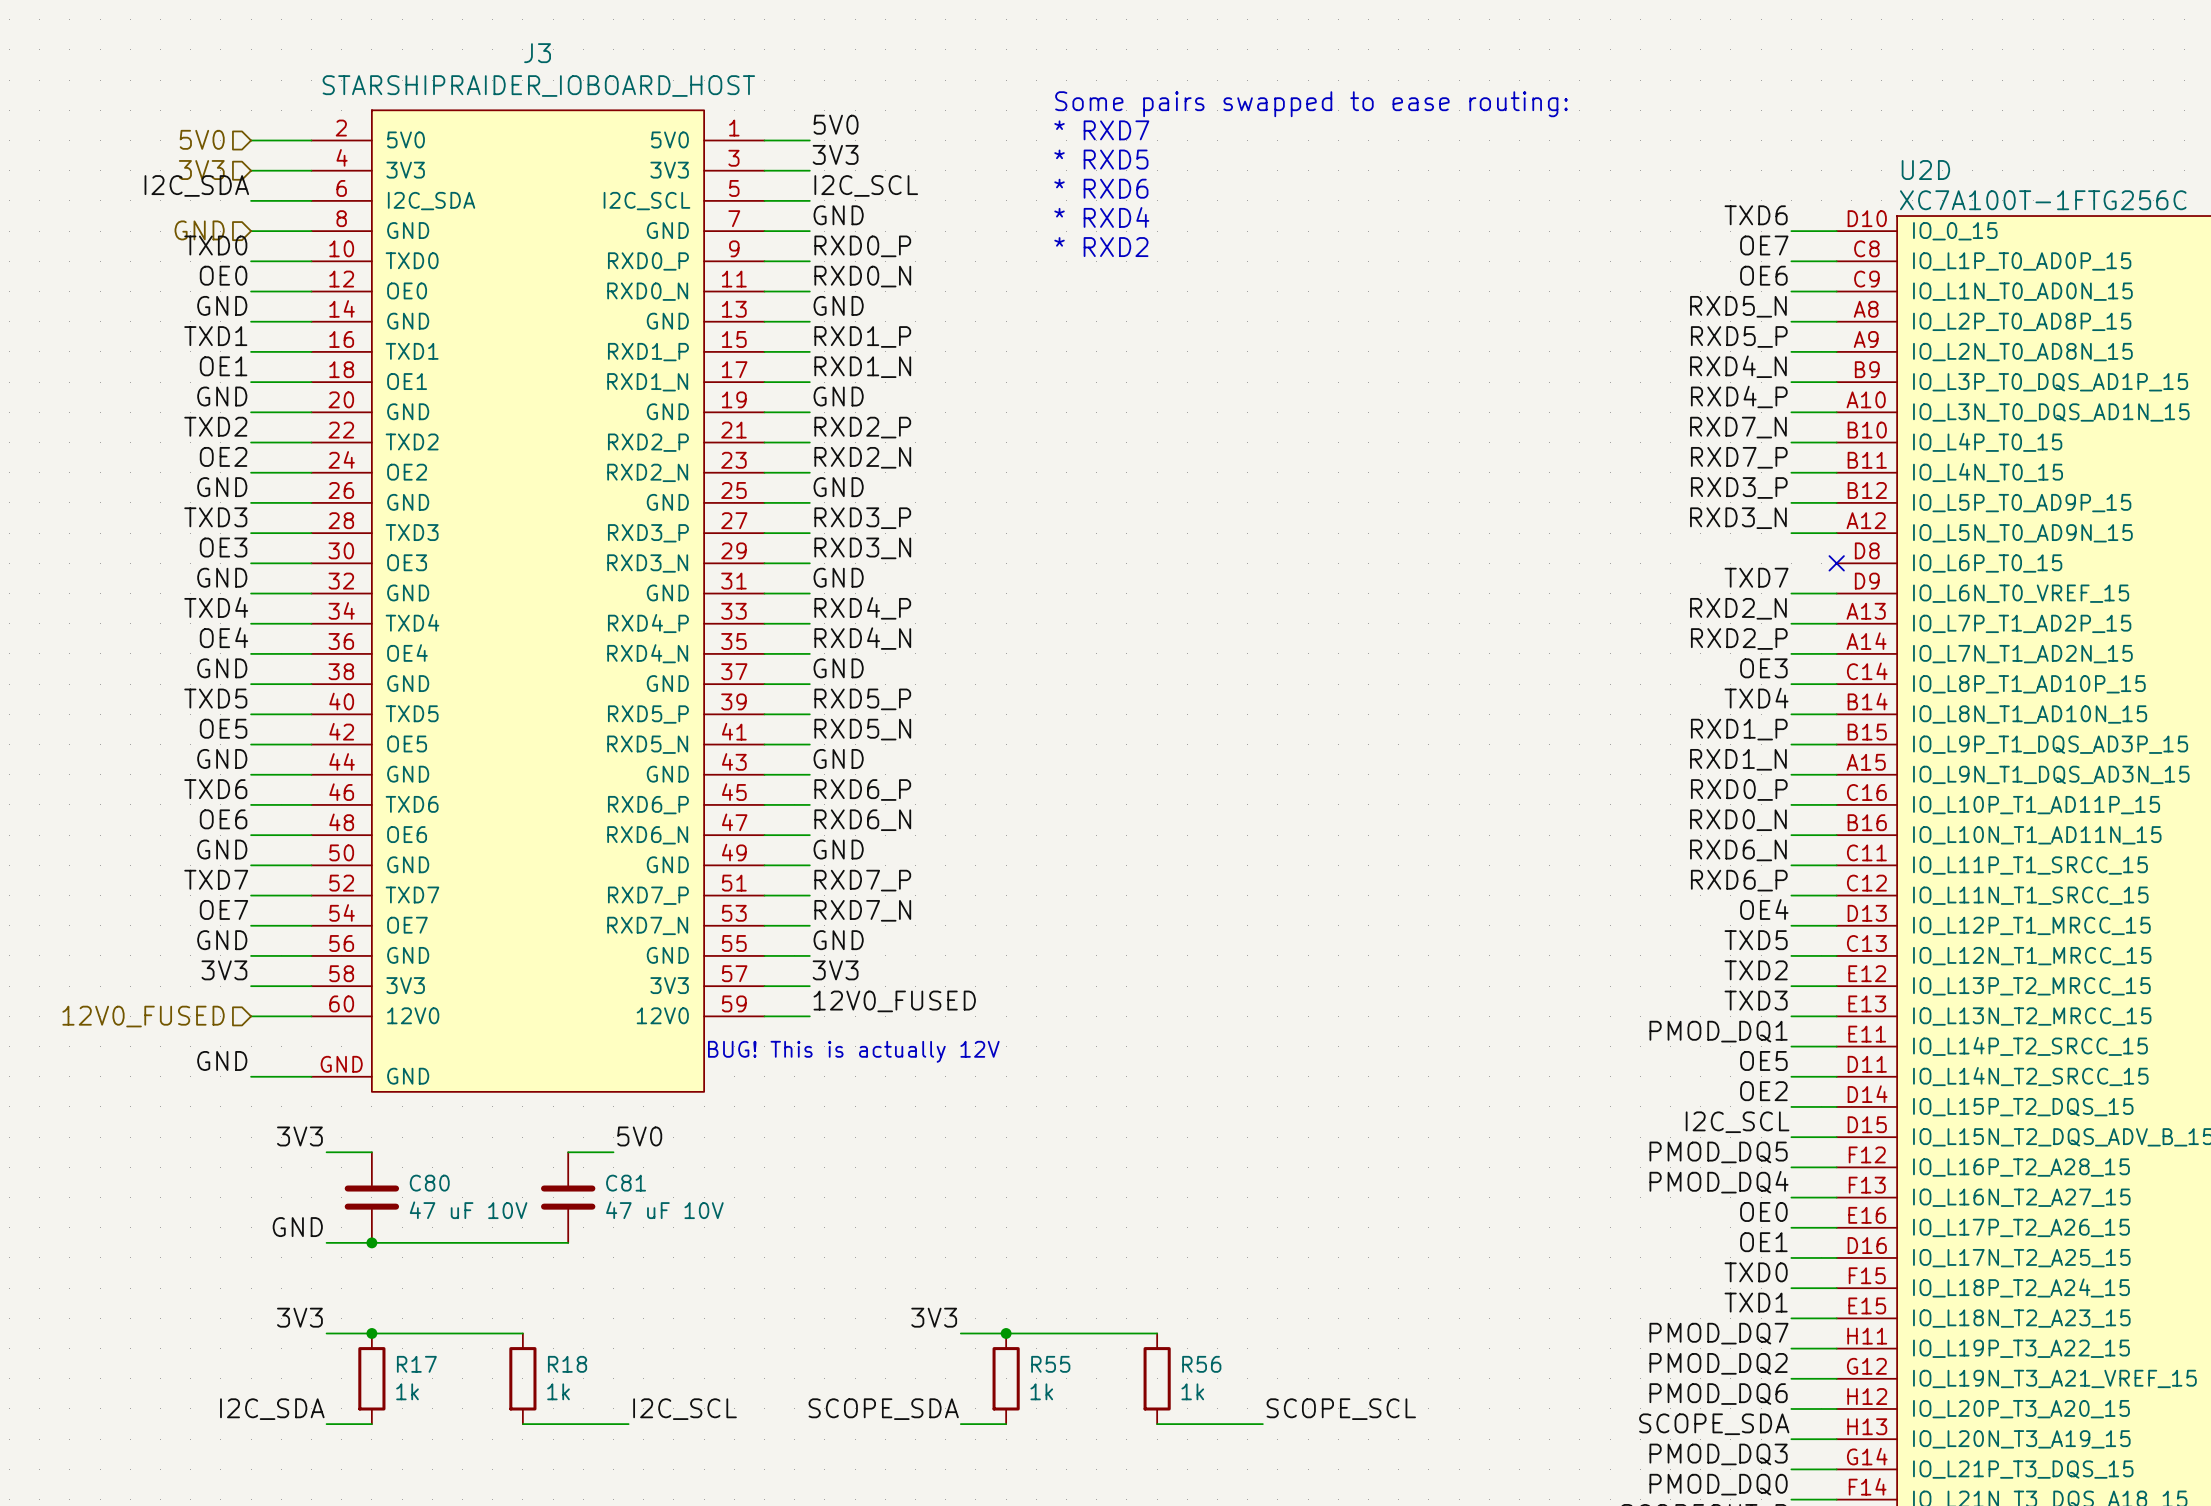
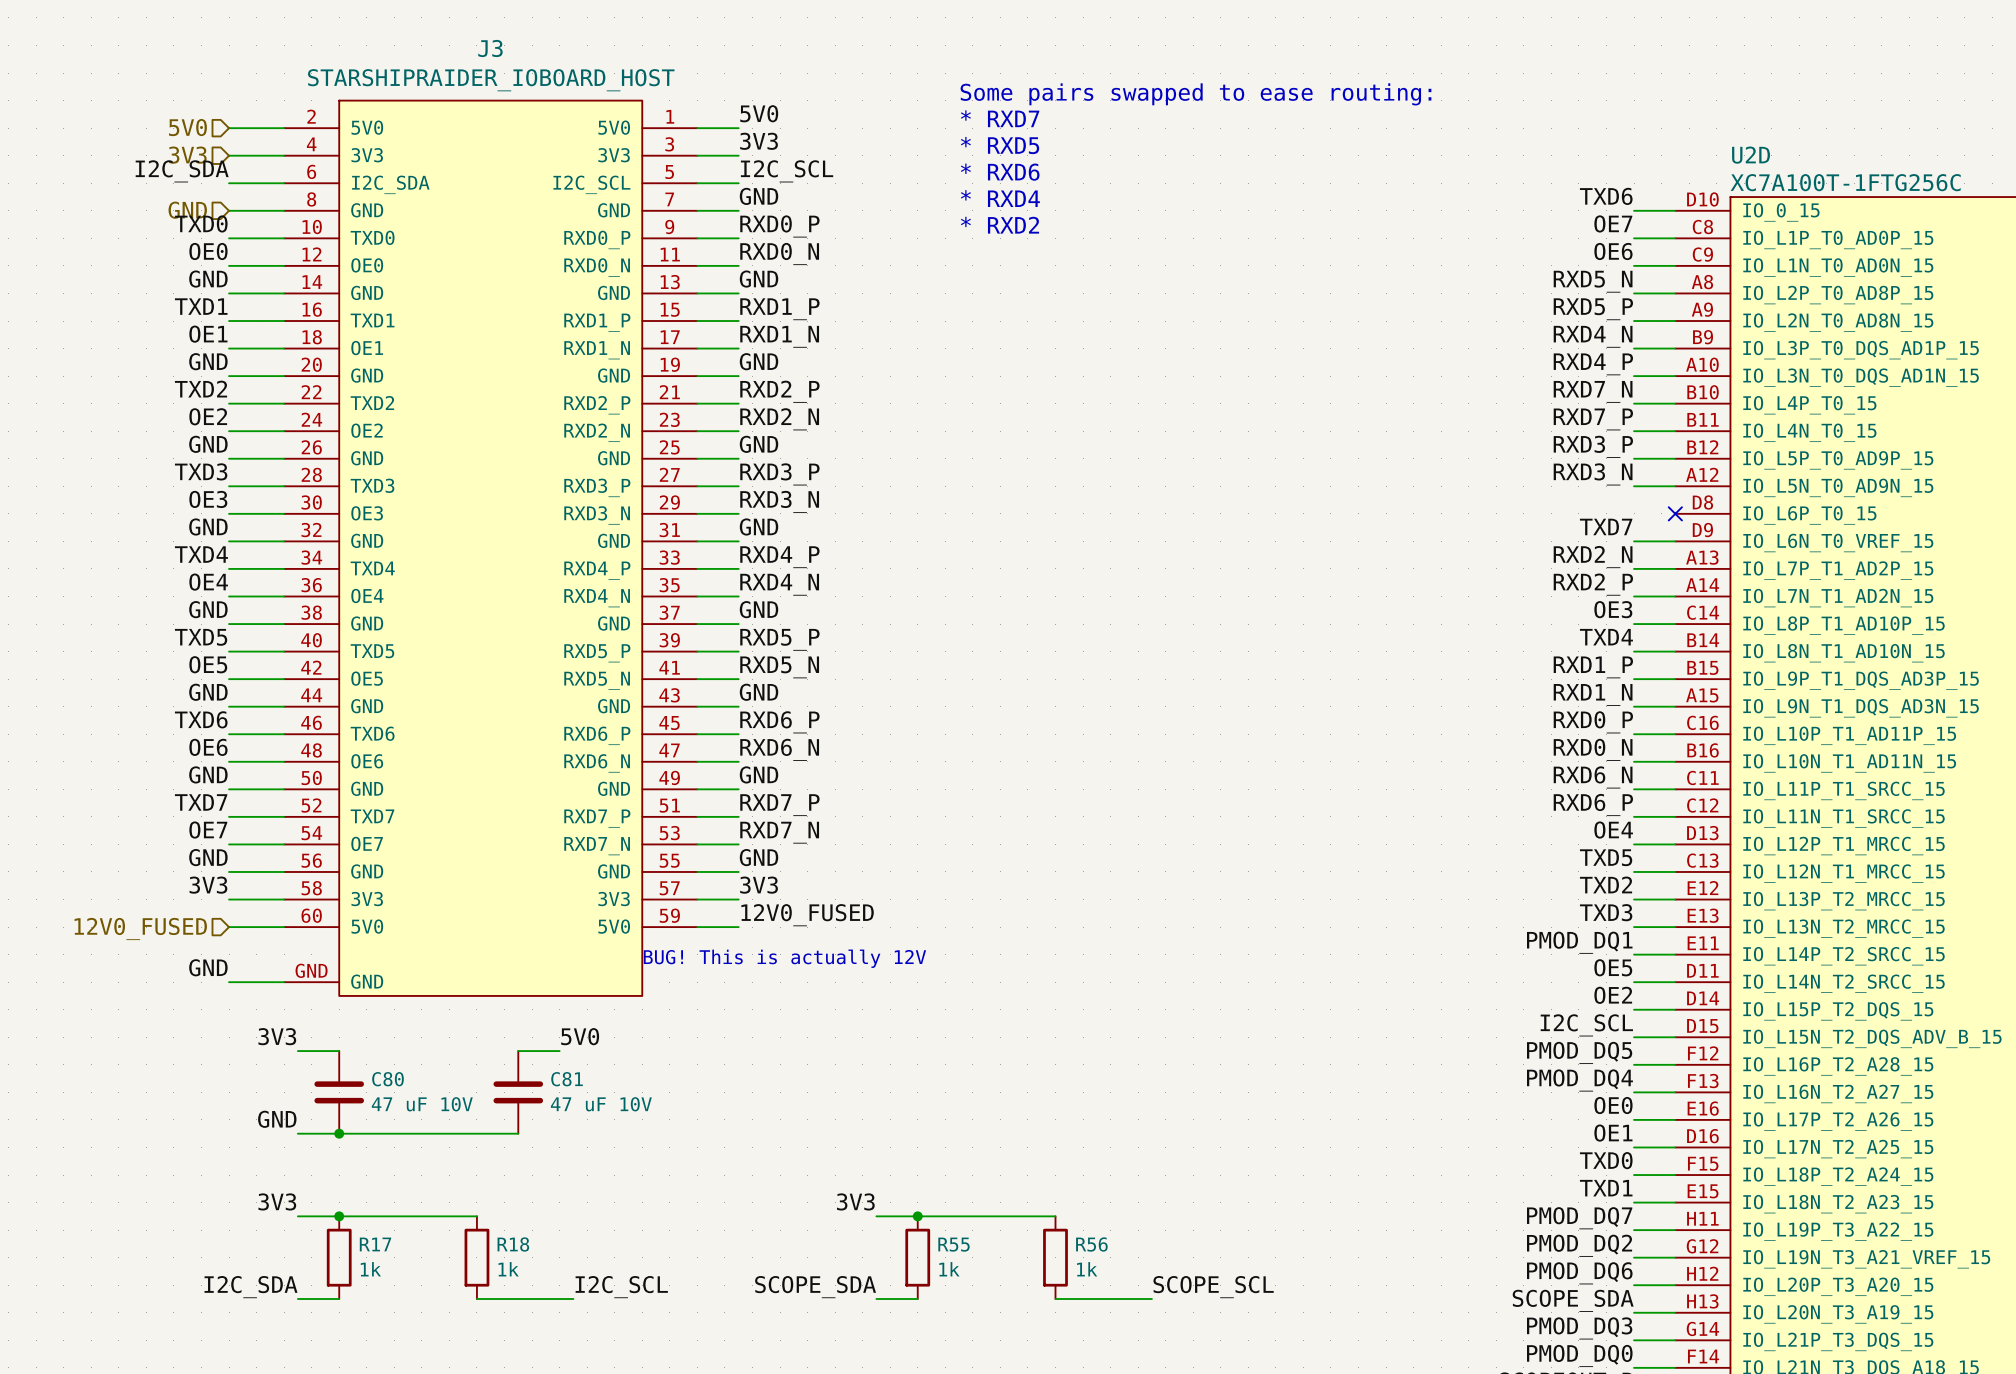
J3 pin name: 12V0 (413, 1015) -> 5V0 (367, 926)
J3 pin name: 12V0 (662, 1015) -> 5V0 (614, 926)

